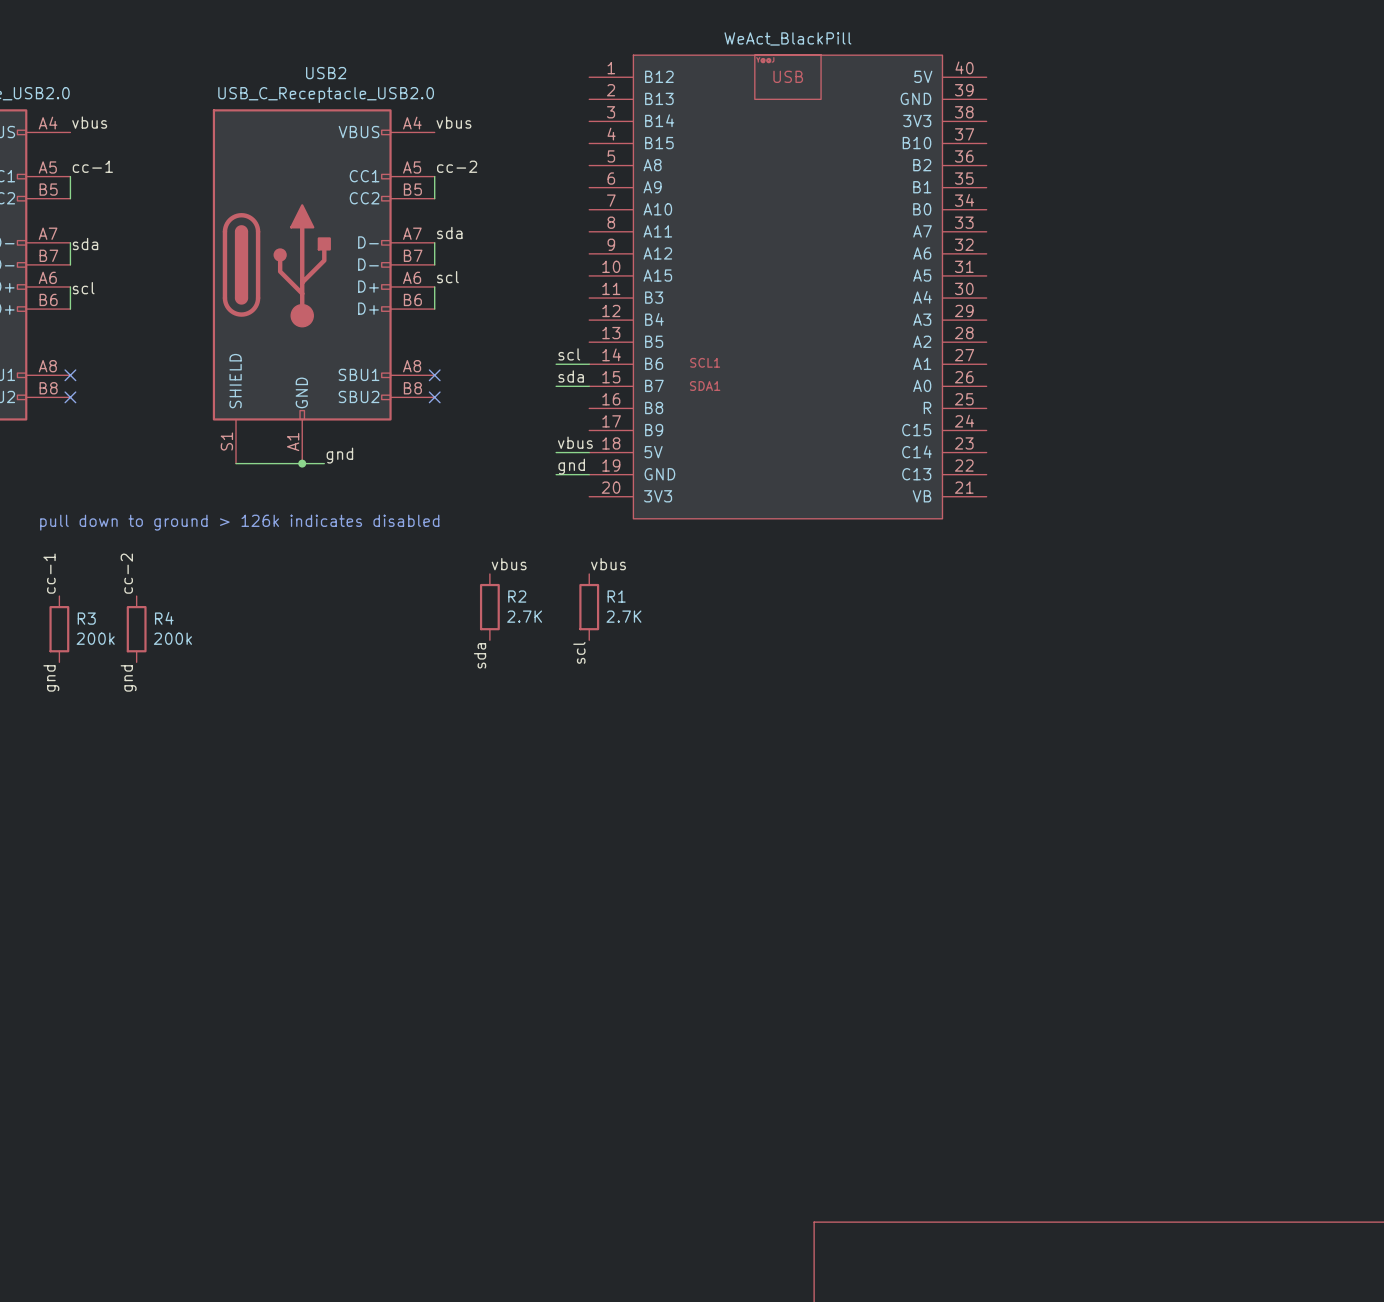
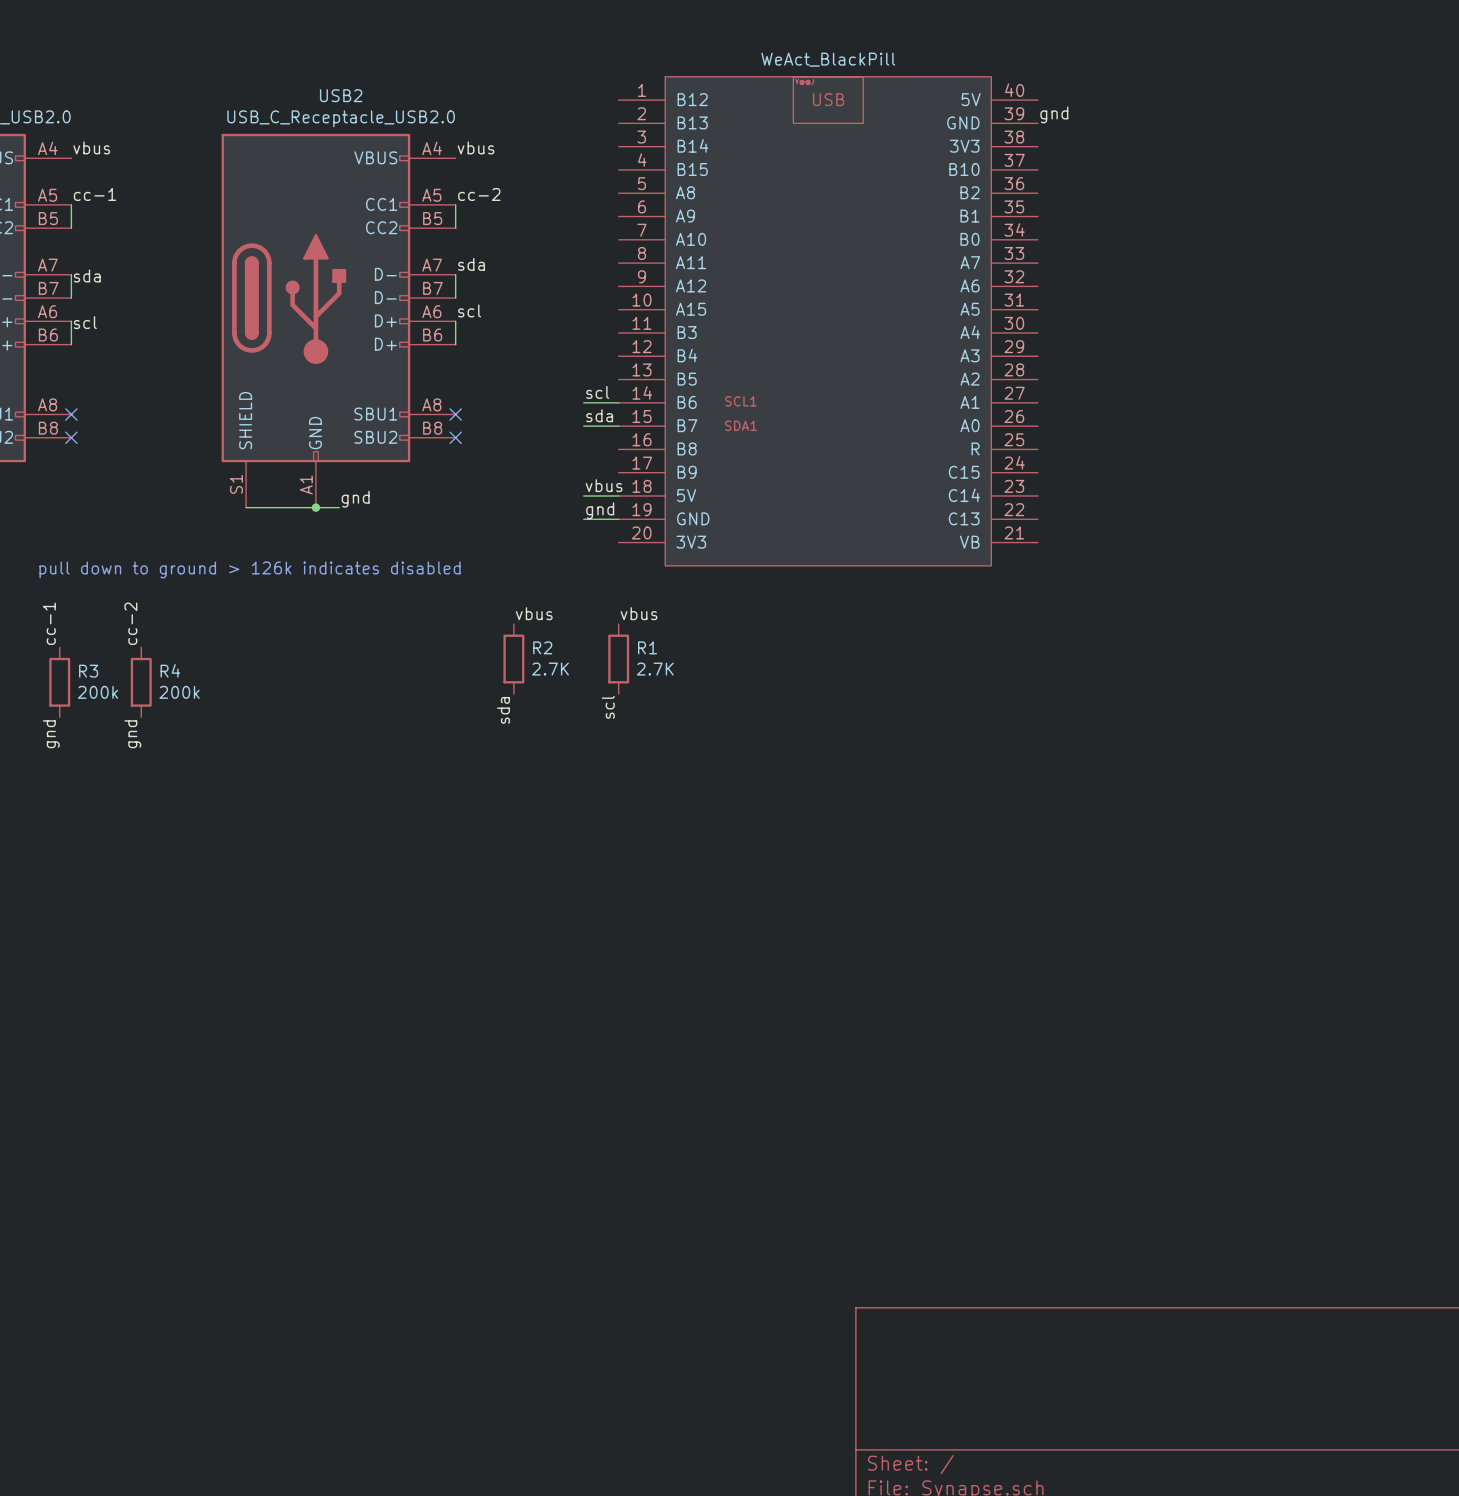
label: none -> gnd (1054, 114)

